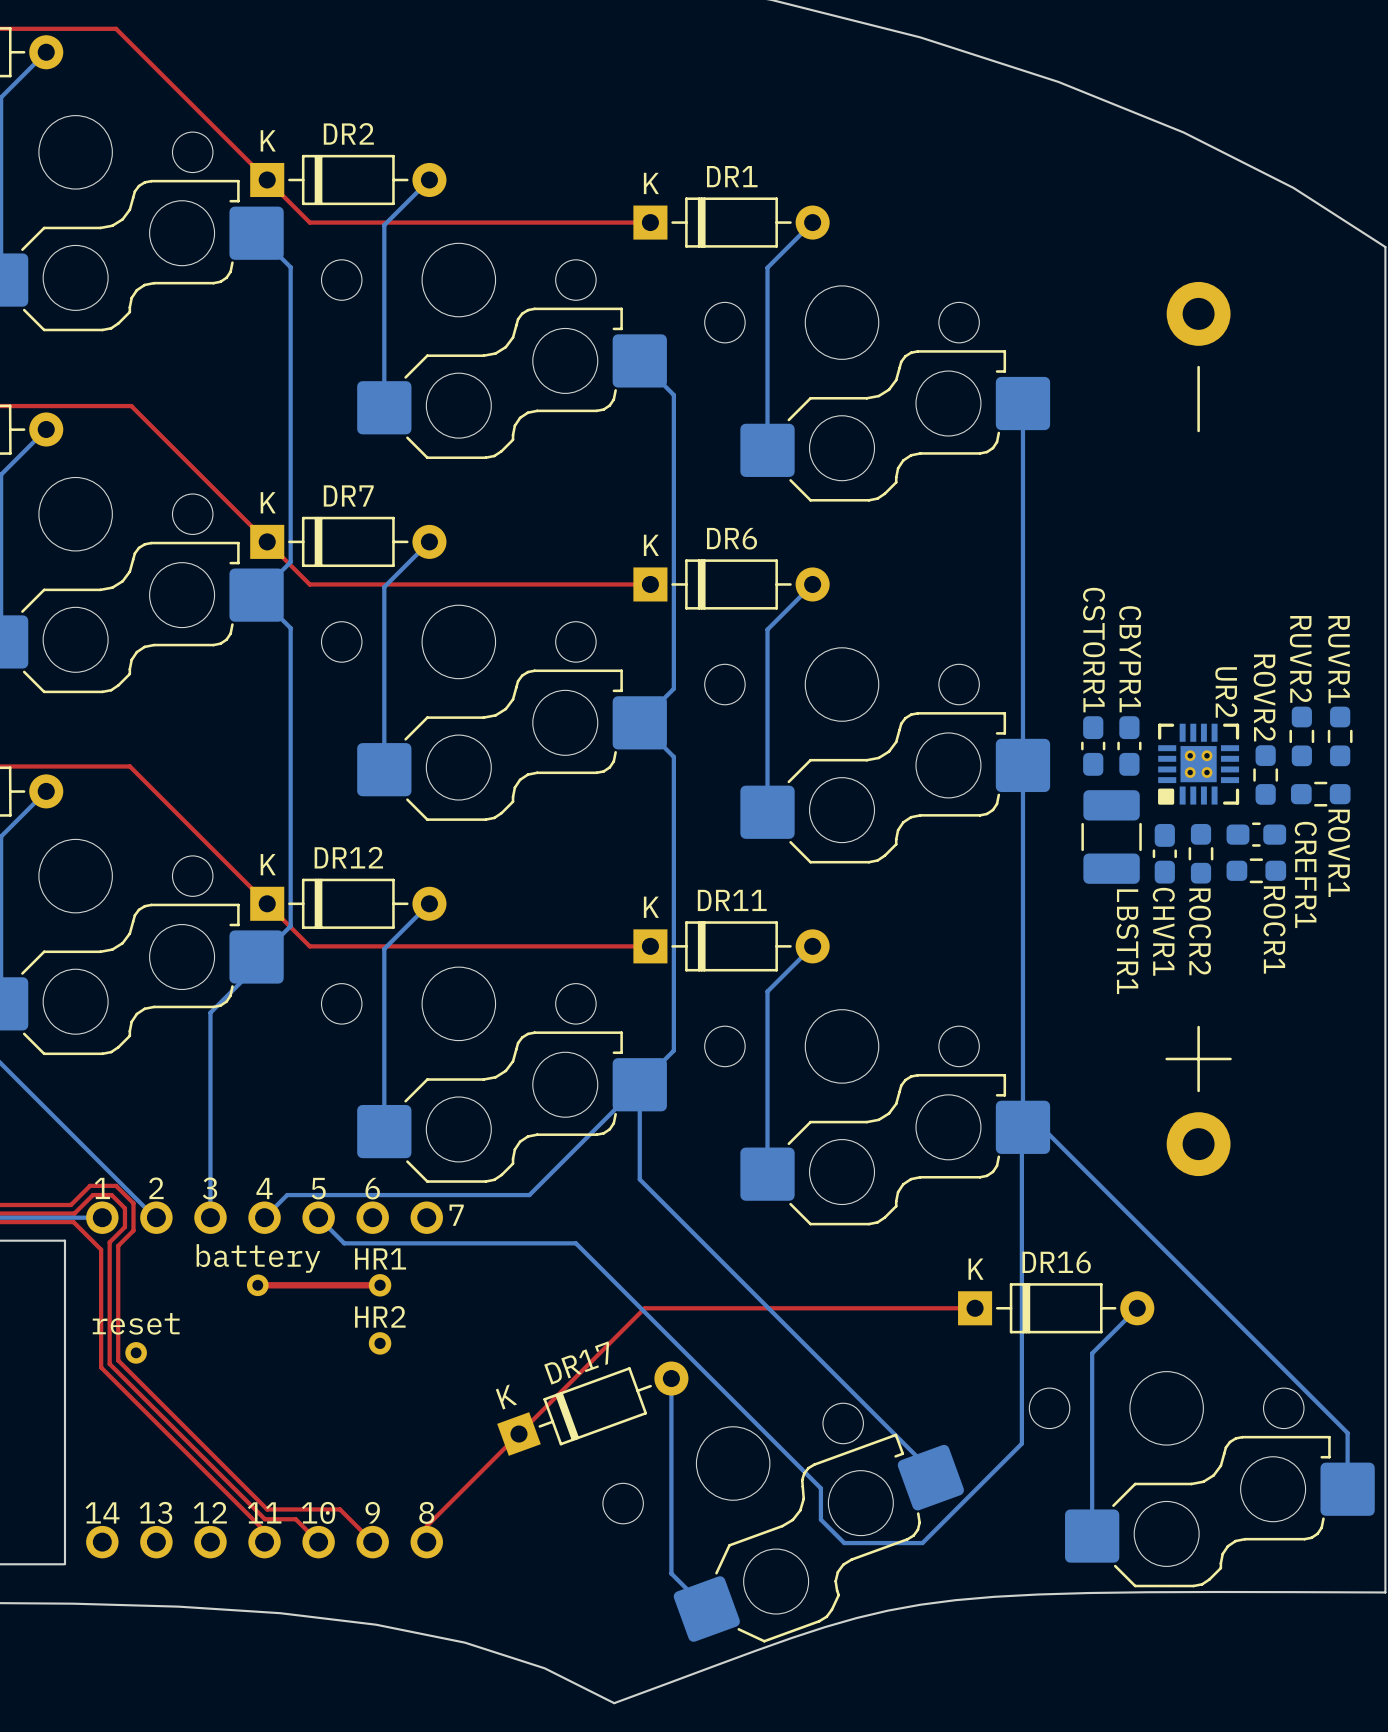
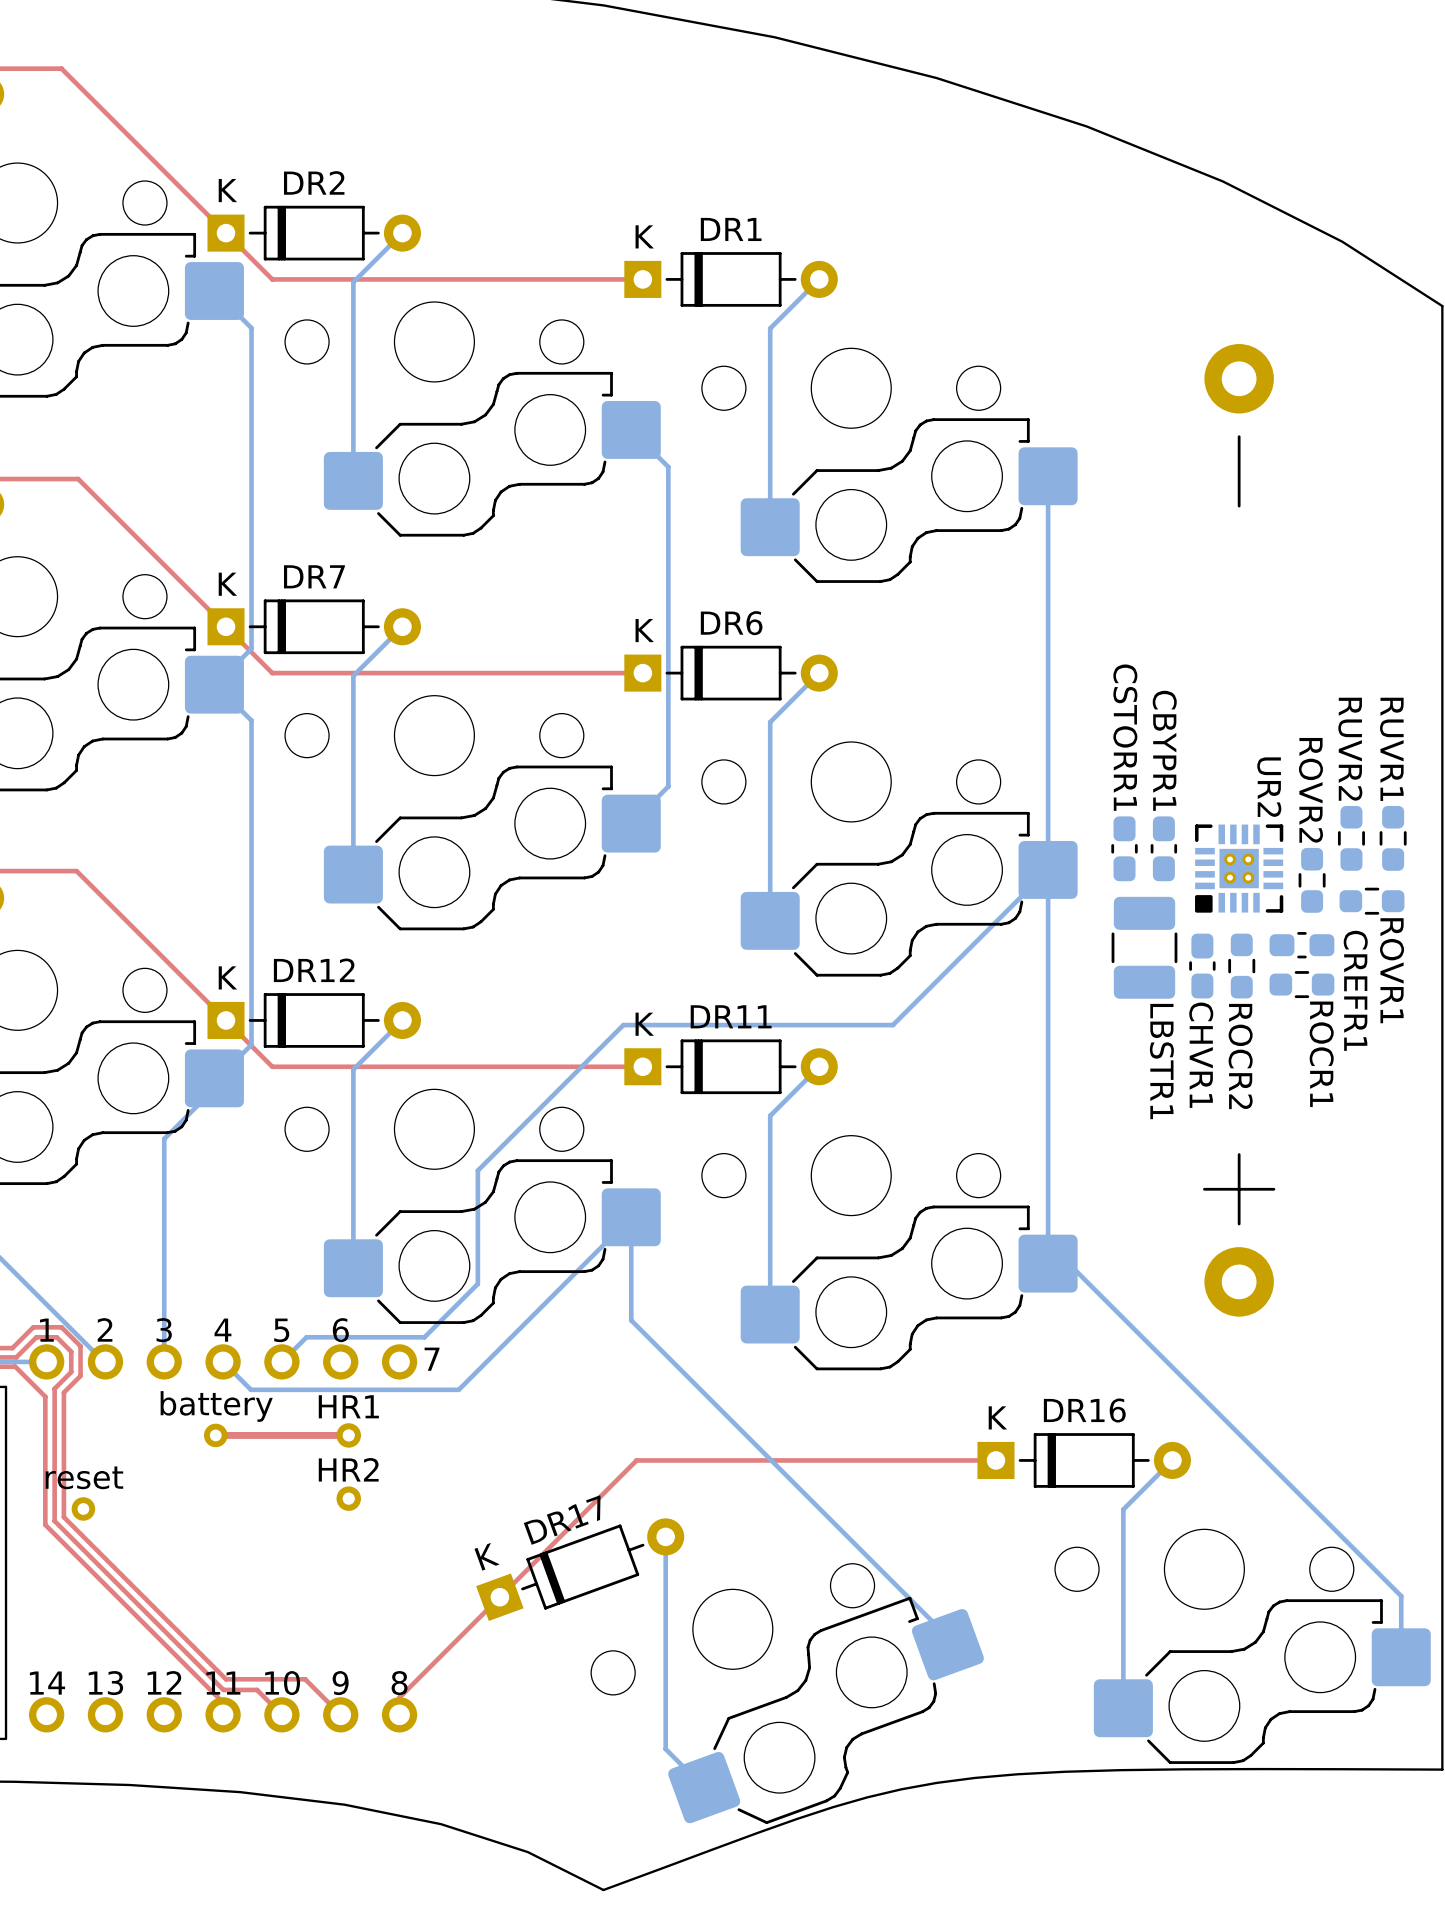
bottom track: (639, 722) (673, 756) (673, 1050) (639, 1084) -> none
bottom track: none -> (1048, 869) (892, 1025) (623, 1025) (477, 1170) (477, 1283) (424, 1337)
bottom track: (1022, 1127) (1021, 1443) (922, 1543) (844, 1543) (820, 1519) (820, 1488) (575, 1243) (481, 1243) -> none
bottom track: (341, 1195) (287, 1195) (264, 1217) -> (309, 1389) (251, 1389) (223, 1361)
bottom track: (529, 1195) (449, 1195) -> (511, 1337) (458, 1389)
bottom track: (318, 1217) (344, 1243) -> (281, 1361) (306, 1337)

